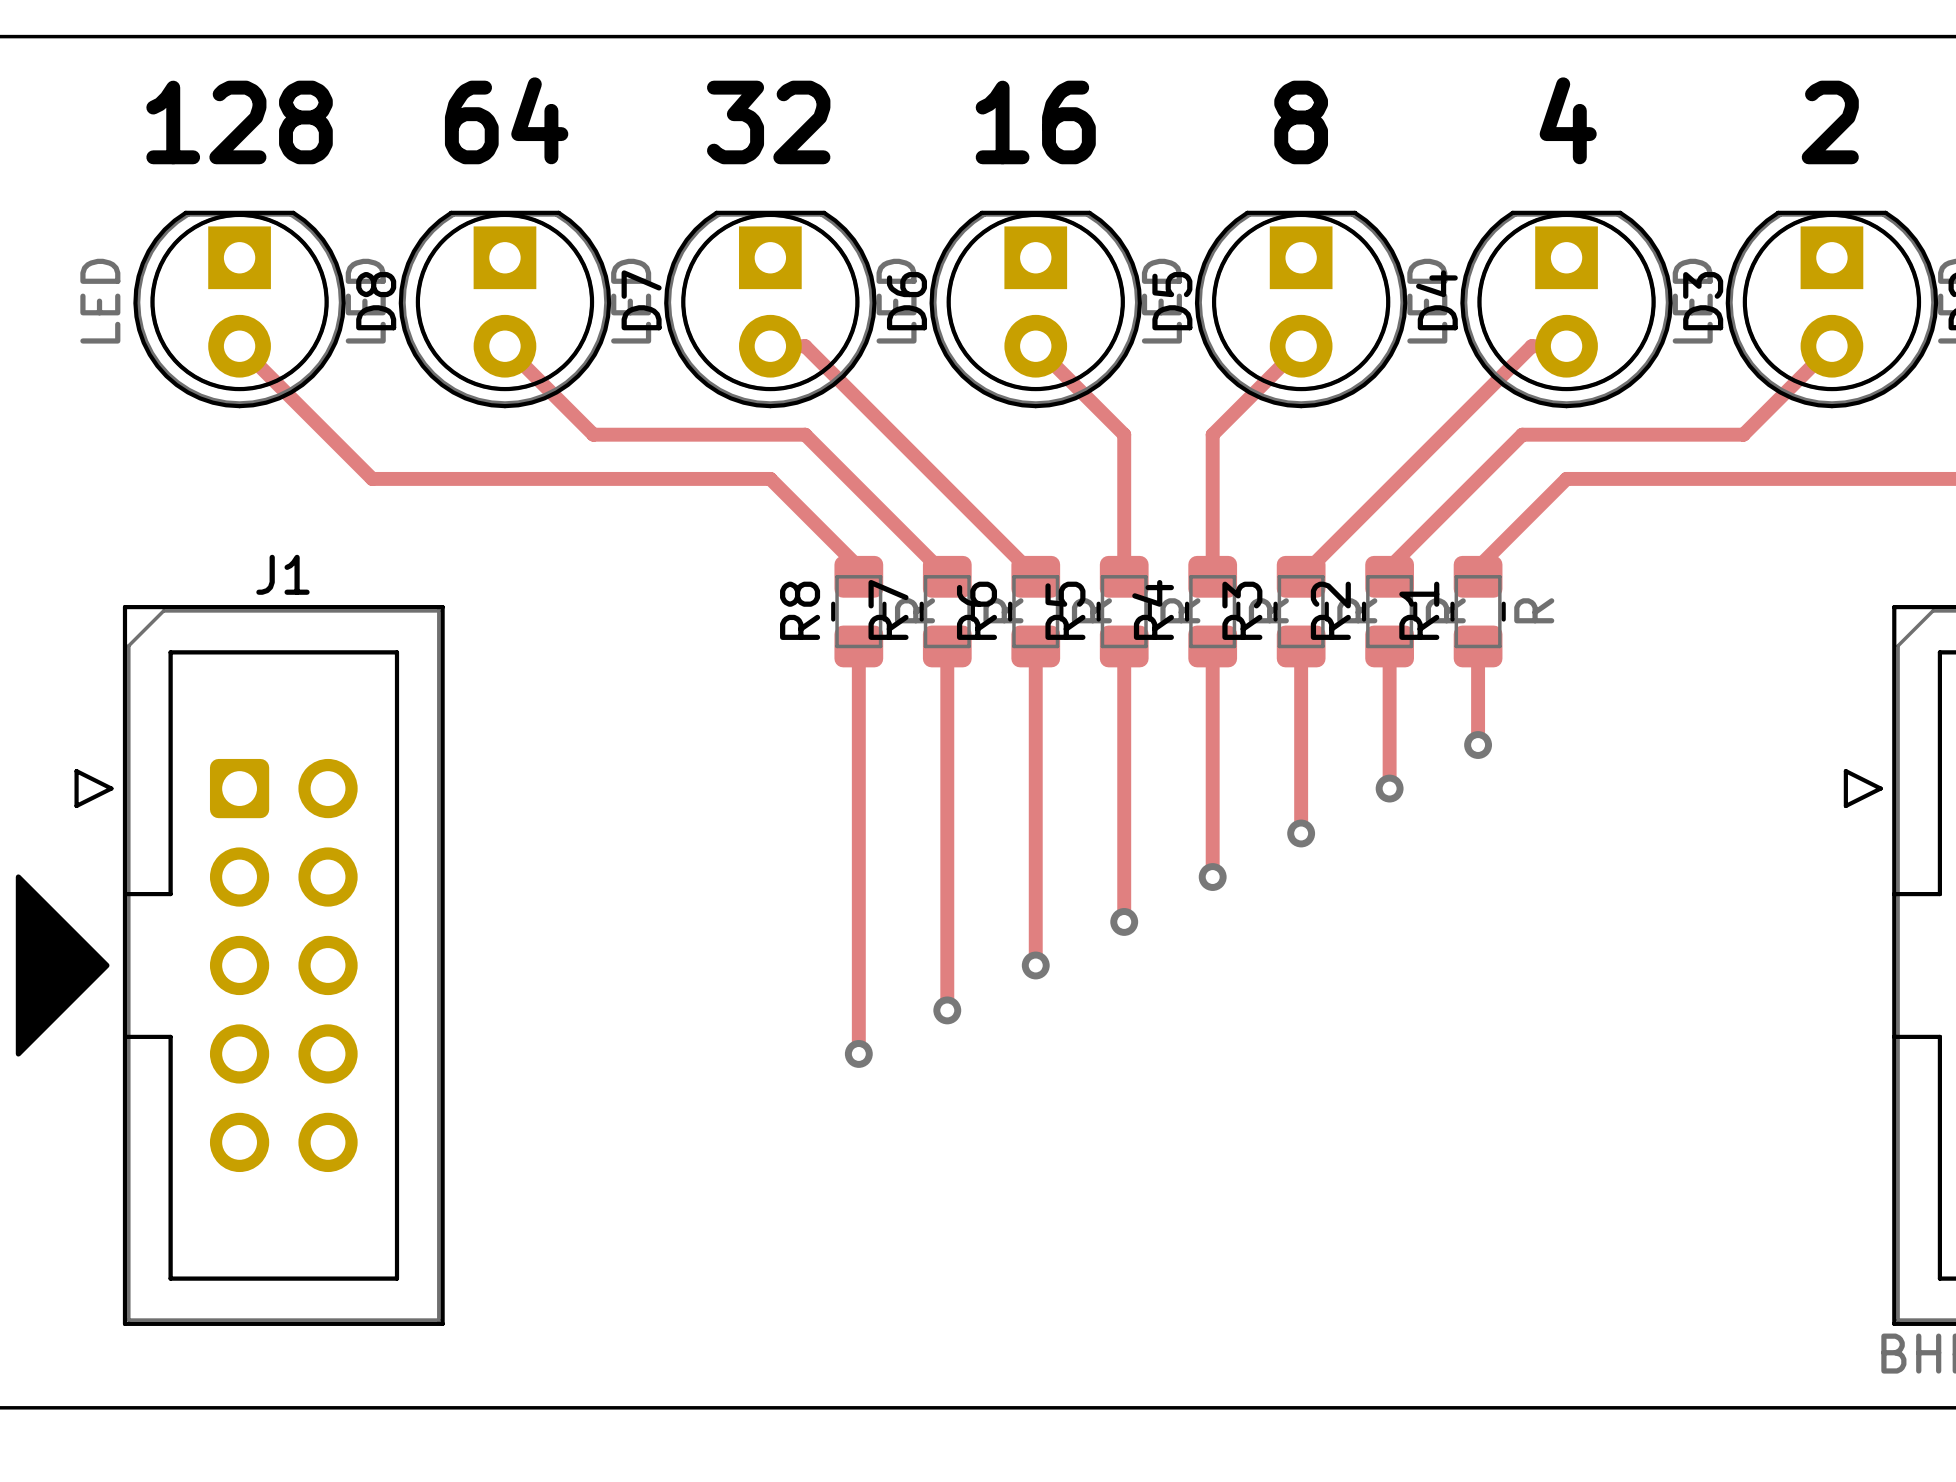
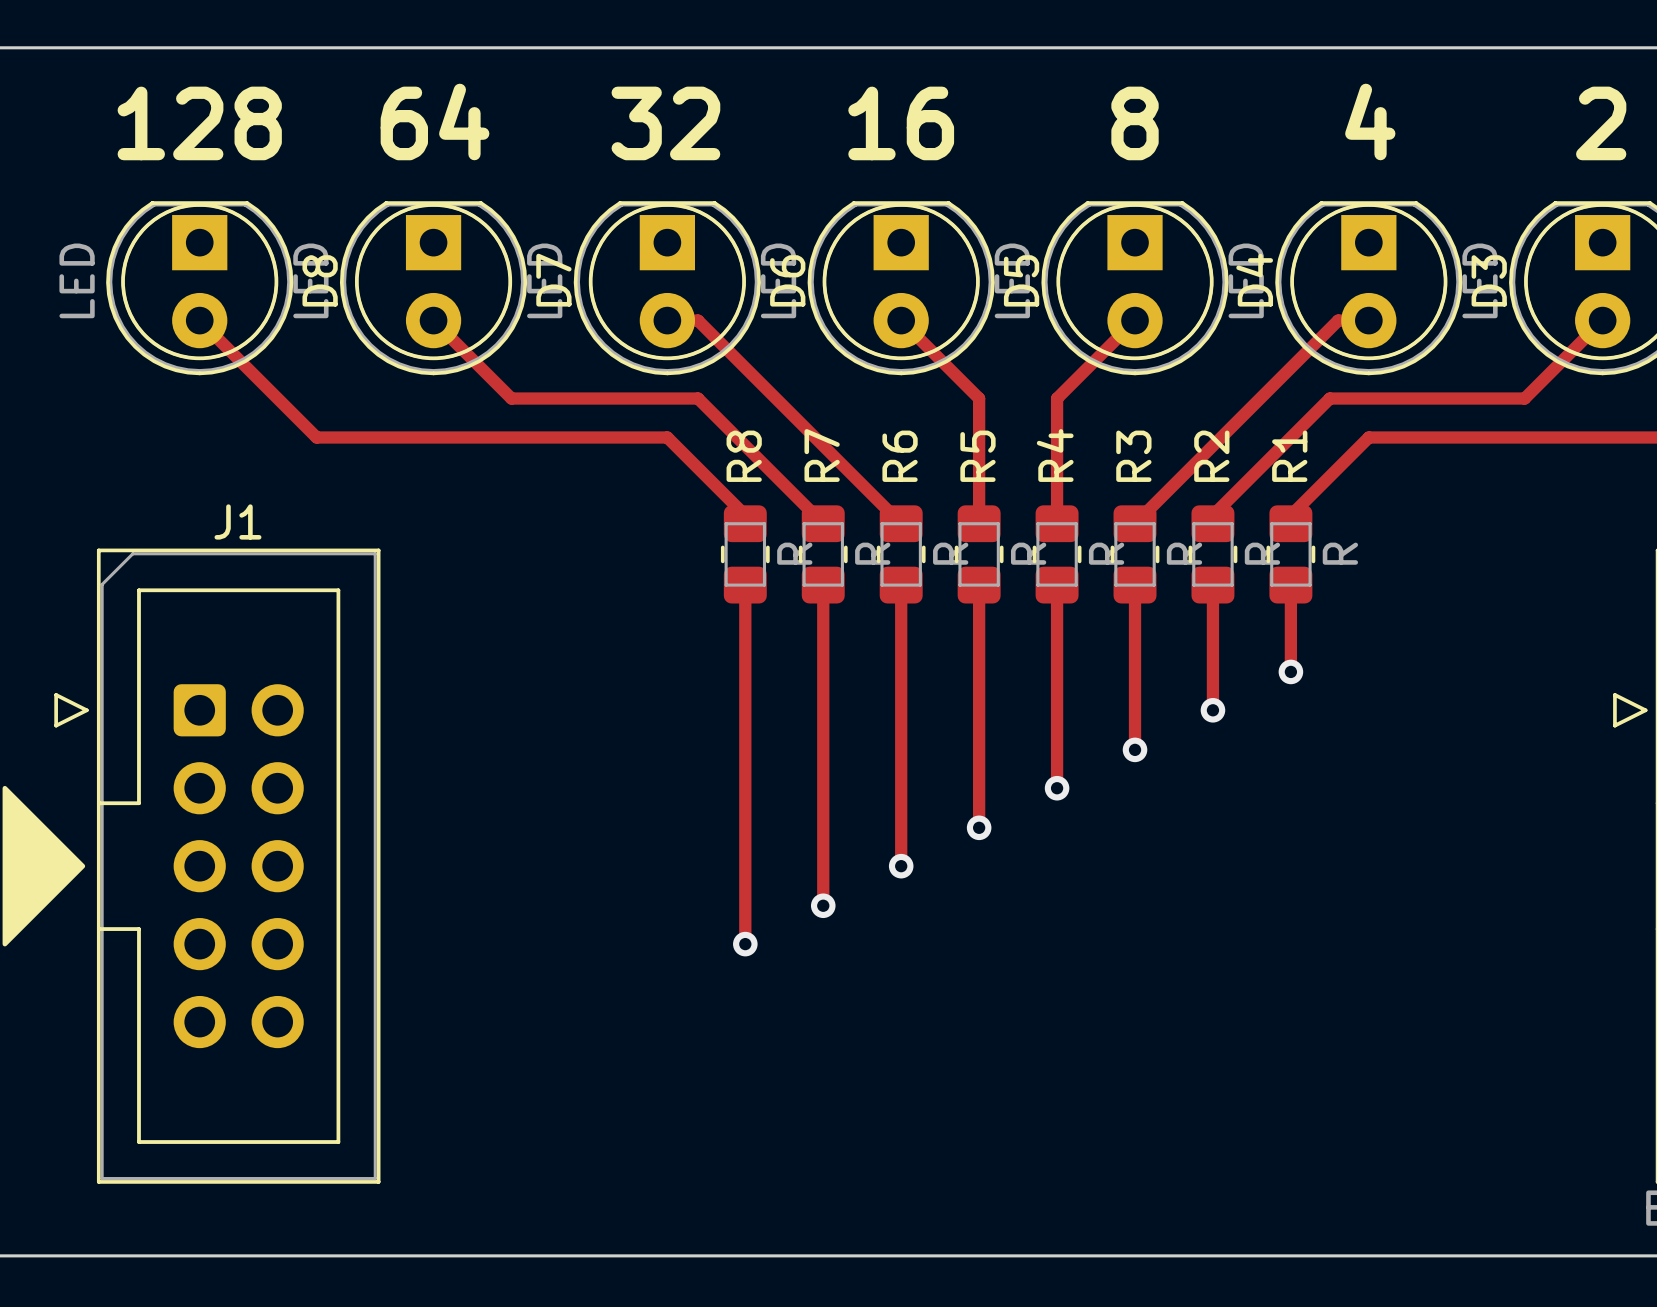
R7 name position: R7 (888, 609) -> R7 (822, 455)
R4 name position: R4 (1153, 609) -> R4 (1055, 455)
R8 name position: R8 (800, 610) -> R8 (744, 456)
R6 name position: R6 (976, 610) -> R6 (900, 456)
R5 name position: R5 (1065, 610) -> R5 (977, 456)
R3 name position: R3 (1242, 610) -> R3 (1133, 456)
R2 name position: R2 (1330, 610) -> R2 (1211, 456)
R1 name position: R1 (1419, 610) -> R1 (1289, 456)

